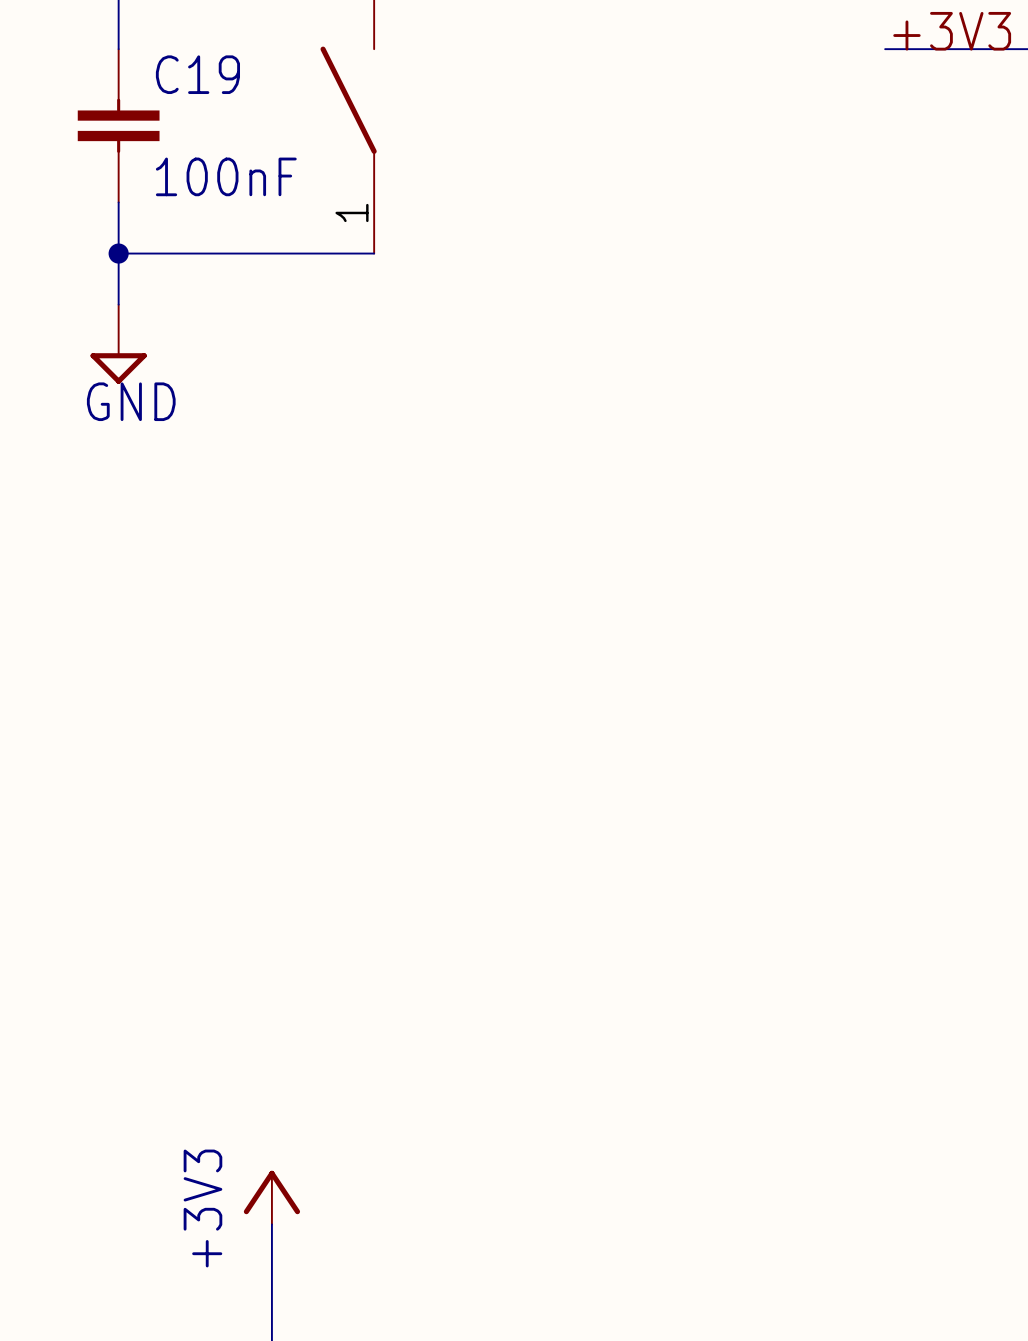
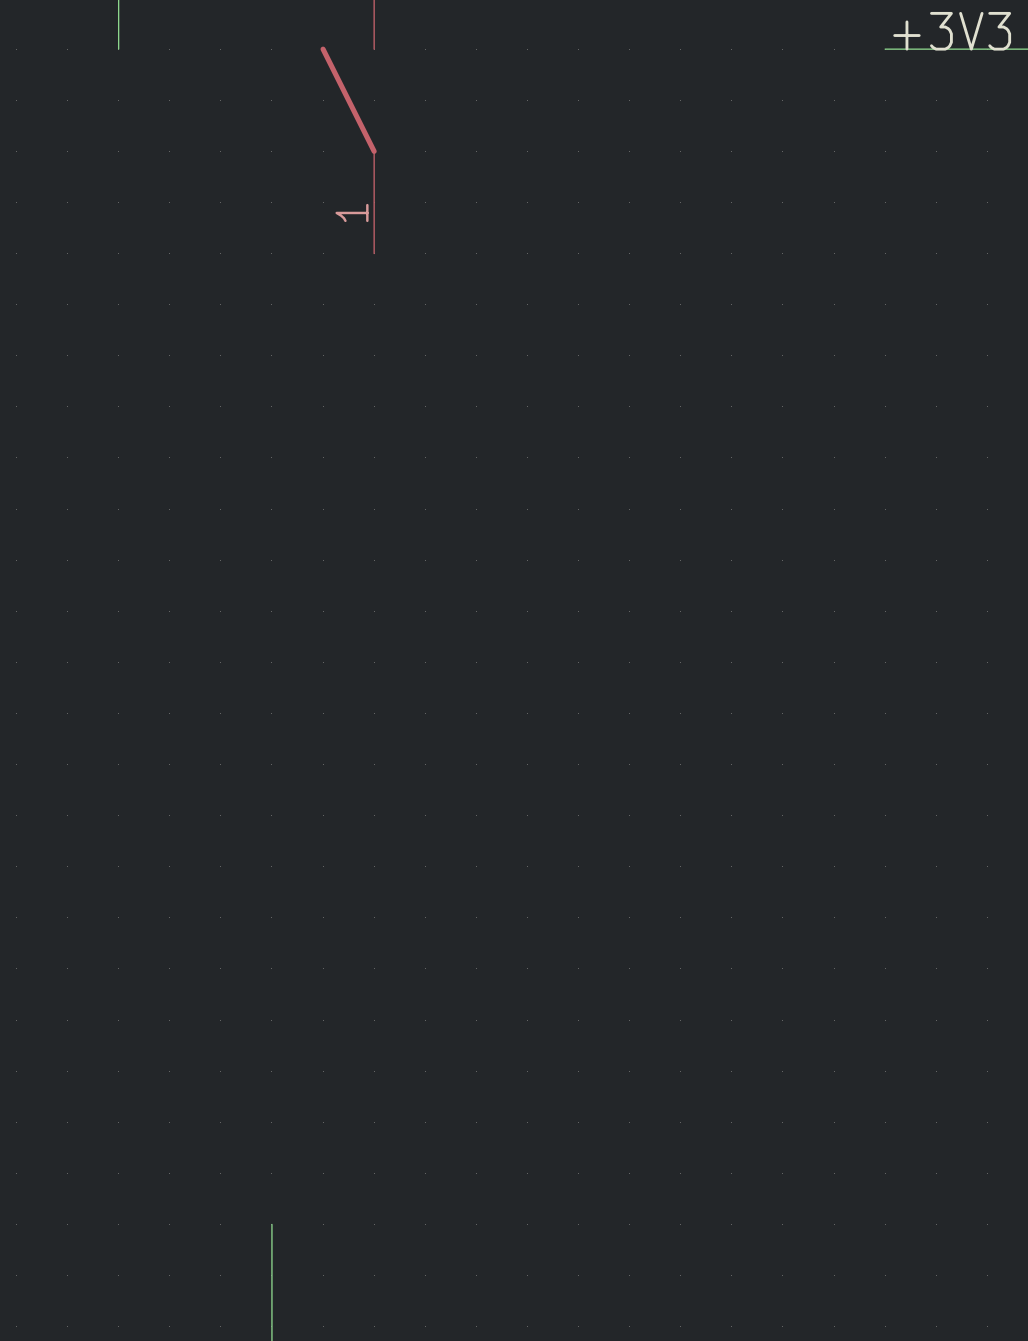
C19: 100nF (118, 125) -> none
wire: (118, 202) (118, 304) -> none
wire: (118, 253) (374, 253) -> none
junction: (118, 253) -> none
power symbol: GND (118, 344) -> none
power symbol: +3V3 (271, 1197) -> none

